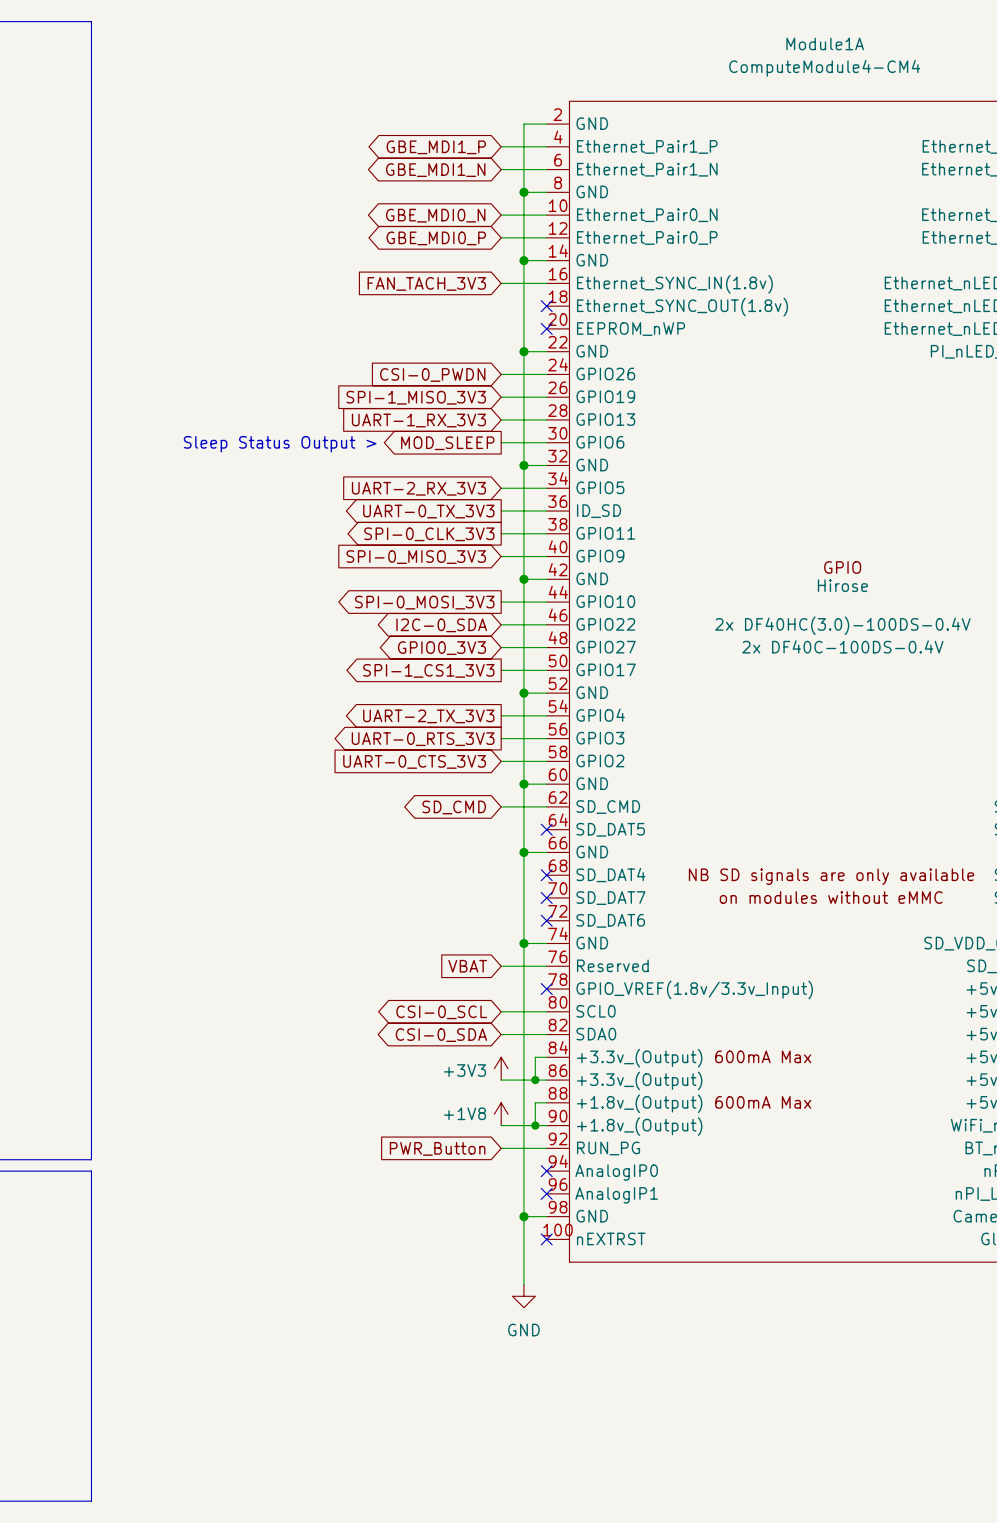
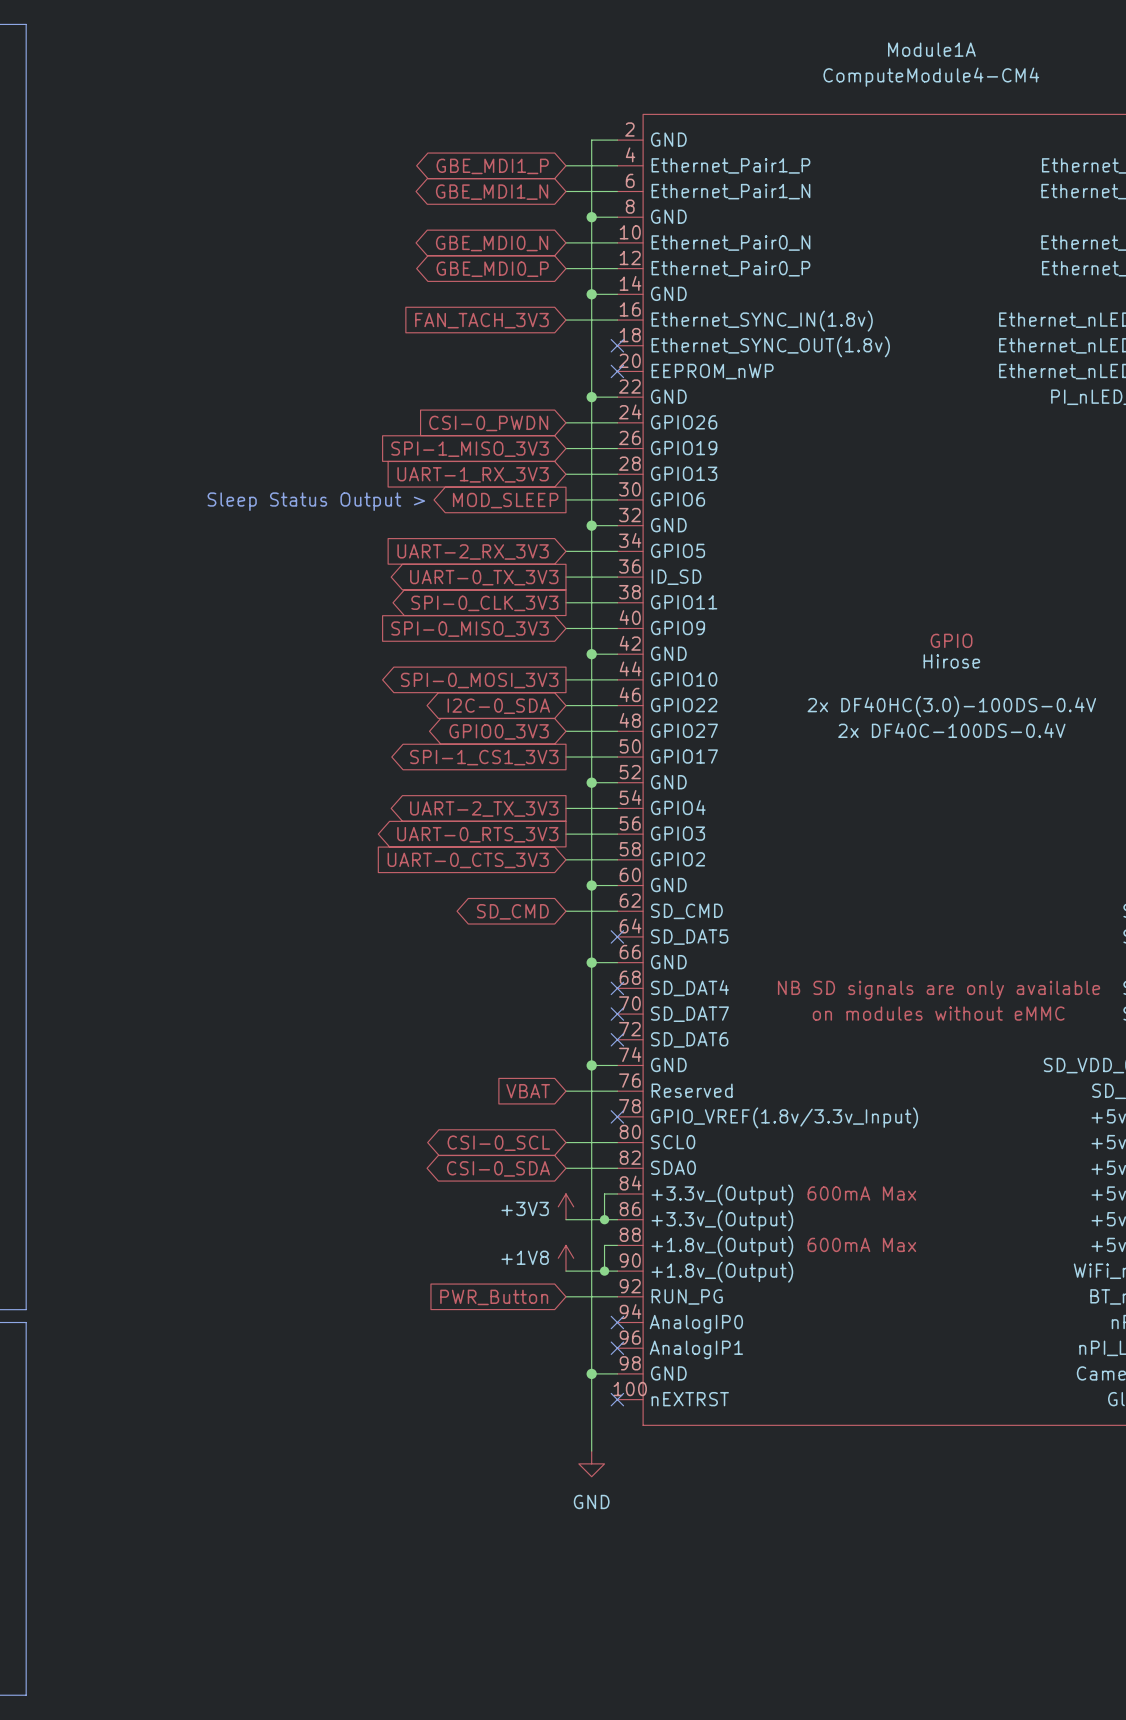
line: (23, 21) (91, 21) (91, 1159) (23, 1159) -> (26, 24) (26, 1309)
line: (23, 1171) (91, 1171) (91, 1501) (23, 1501) -> (26, 1322) (26, 1695)

